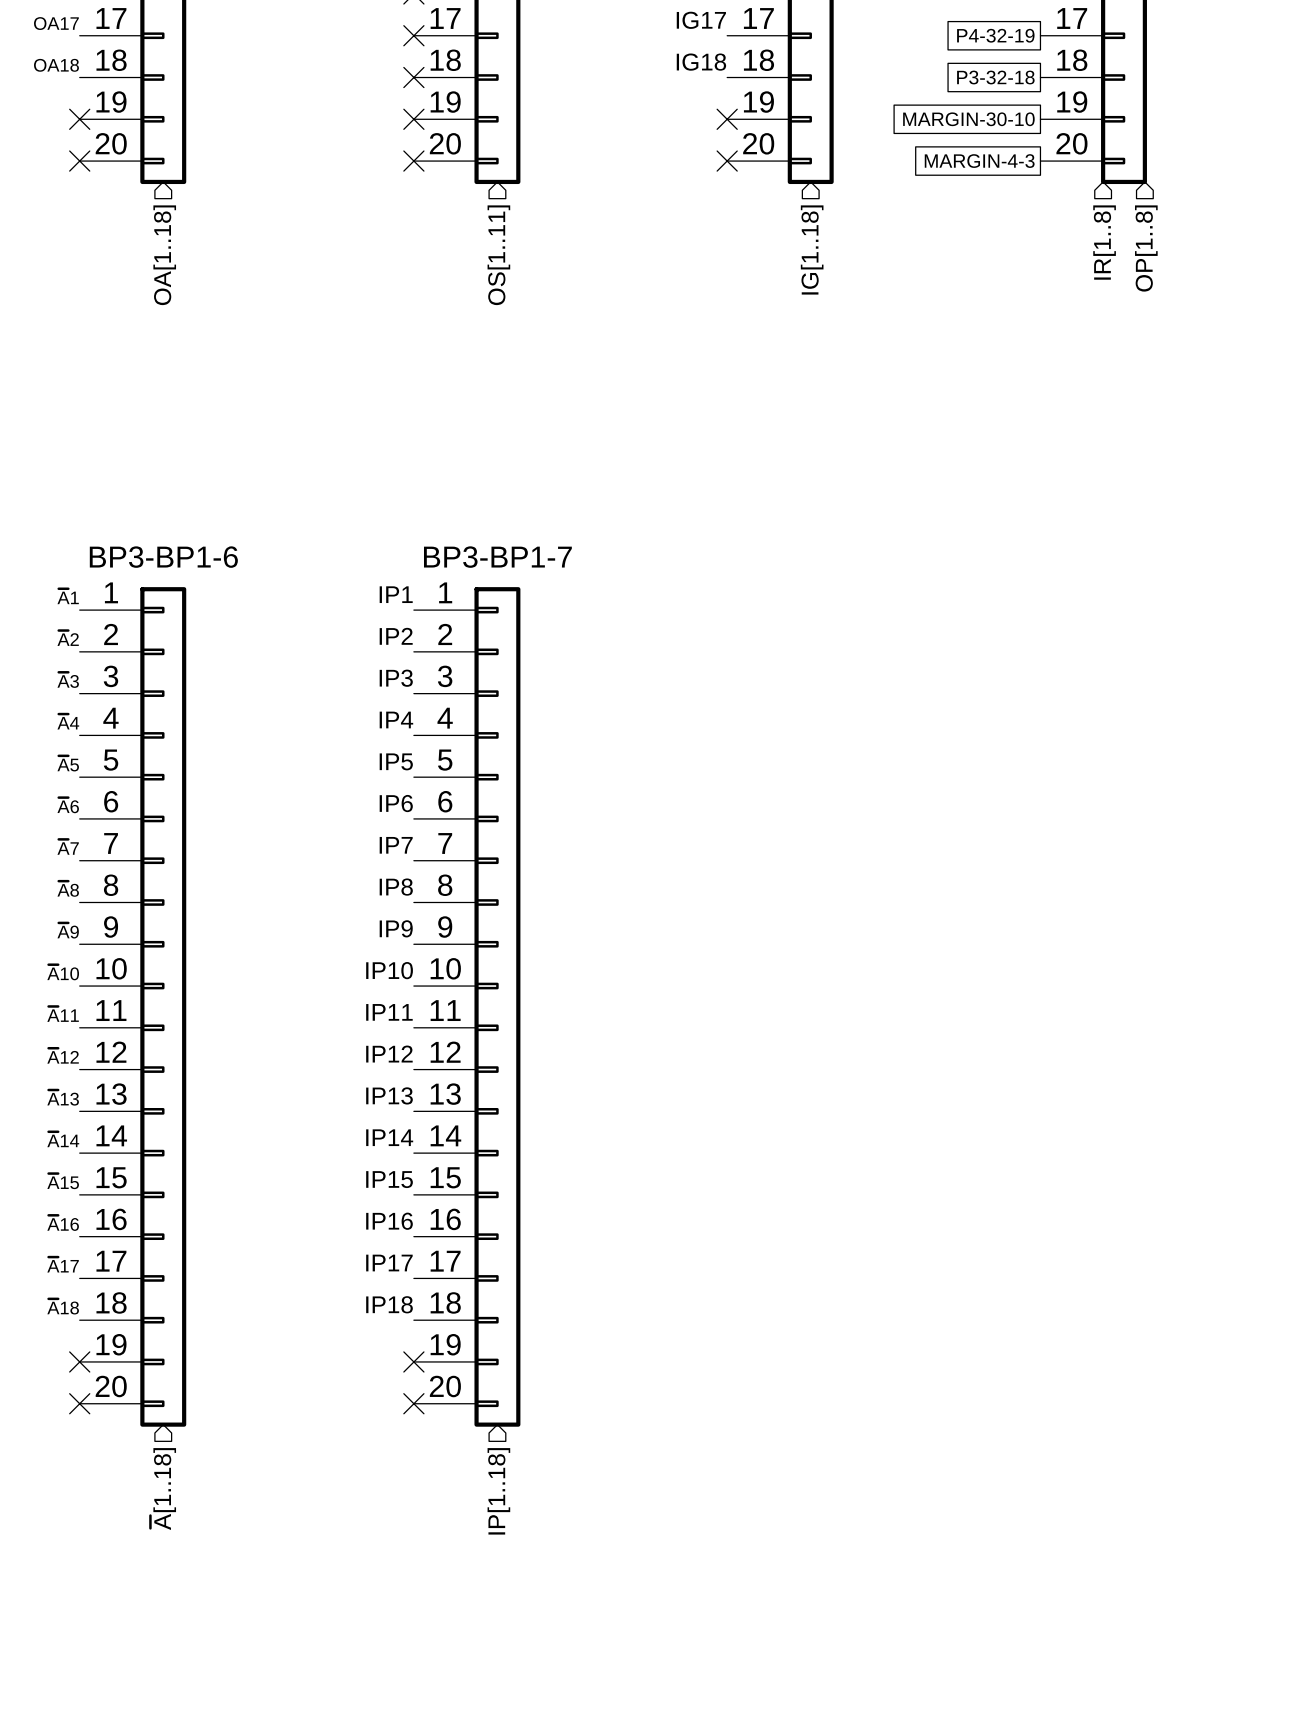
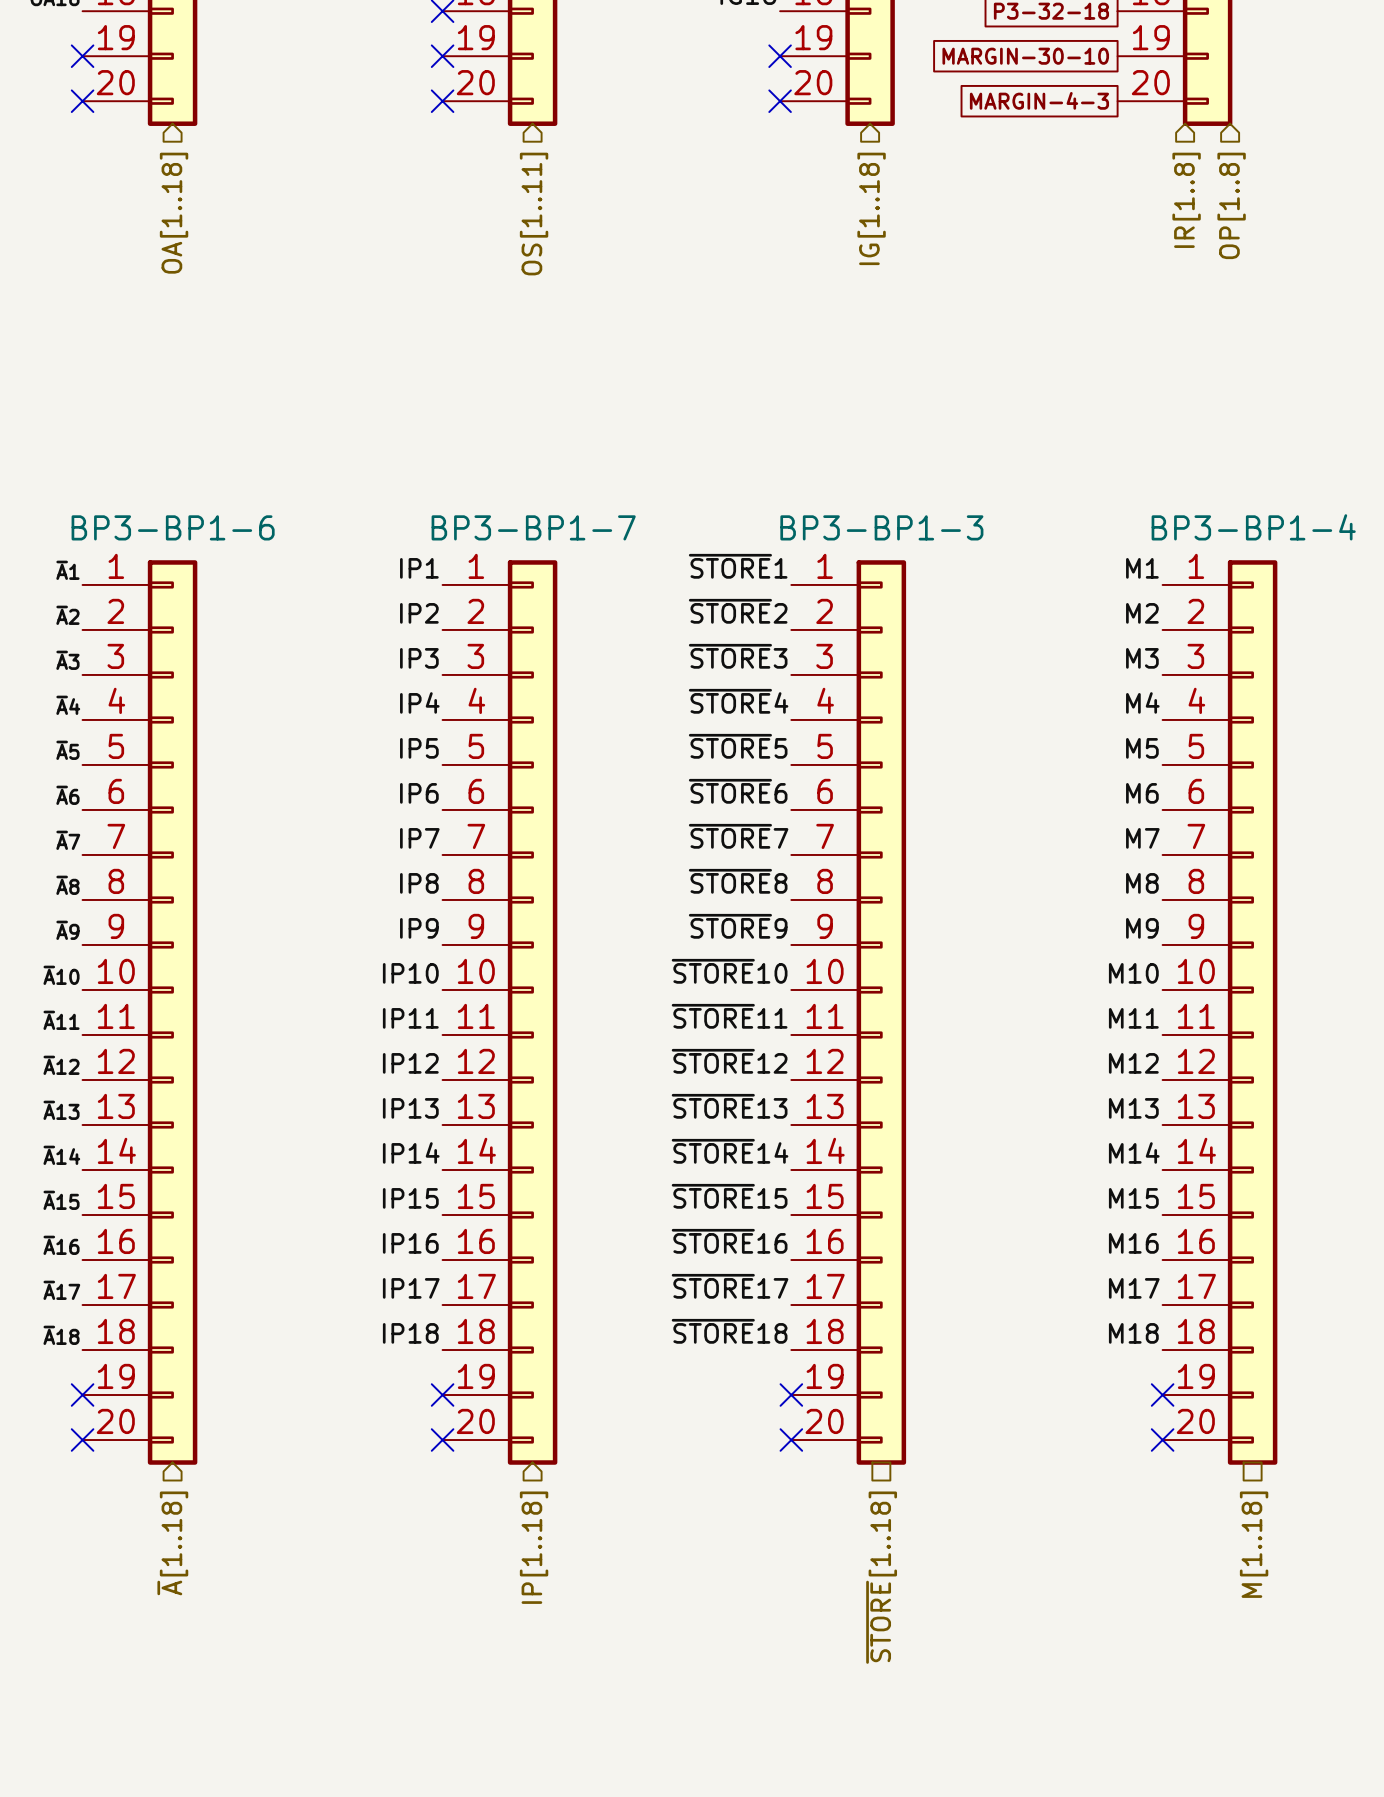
label: none -> ~{STORE}1 (738, 566)
label: none -> M1 (1142, 568)
label: none -> ~{STORE}2 (738, 611)
label: none -> M2 (1142, 613)
label: none -> ~{STORE}3 (738, 656)
label: none -> M3 (1142, 658)
label: none -> ~{STORE}4 (738, 701)
label: none -> M4 (1142, 702)
label: none -> ~{STORE}5 (738, 746)
label: none -> M5 (1142, 748)
label: none -> ~{STORE}6 (738, 791)
label: none -> M6 (1142, 793)
label: none -> ~{STORE}7 (738, 836)
label: none -> M7 (1142, 838)
label: none -> ~{STORE}8 (738, 881)
label: none -> M8 (1142, 883)
label: none -> ~{STORE}9 (738, 926)
label: none -> M9 (1142, 928)
label: none -> ~{STORE}10 (729, 971)
label: none -> M10 (1133, 973)
BP3-BP1-3: none -> (848, 1012)
BP3-BP1-4: none -> (1219, 1012)
label: none -> ~{STORE}11 (729, 1016)
label: none -> M11 (1133, 1018)
label: none -> ~{STORE}12 (729, 1061)
label: none -> M12 (1133, 1063)
label: none -> ~{STORE}13 (729, 1106)
label: none -> M13 (1133, 1108)
label: none -> ~{STORE}14 (730, 1151)
label: none -> M14 (1134, 1152)
label: none -> ~{STORE}15 (729, 1196)
label: none -> M15 (1133, 1198)
label: none -> ~{STORE}16 (729, 1241)
label: none -> M16 (1133, 1243)
label: none -> ~{STORE}17 (730, 1286)
label: none -> M17 (1134, 1288)
label: none -> ~{STORE}18 (729, 1331)
label: none -> M18 (1133, 1333)
no-connect mark: none -> (791, 1395)
no-connect mark: none -> (1162, 1395)
no-connect mark: none -> (791, 1440)
no-connect mark: none -> (1162, 1440)
hierarchical label: none -> M[1..18] (1254, 1544)
hierarchical label: none -> ~{STORE}[1..18] (881, 1577)

